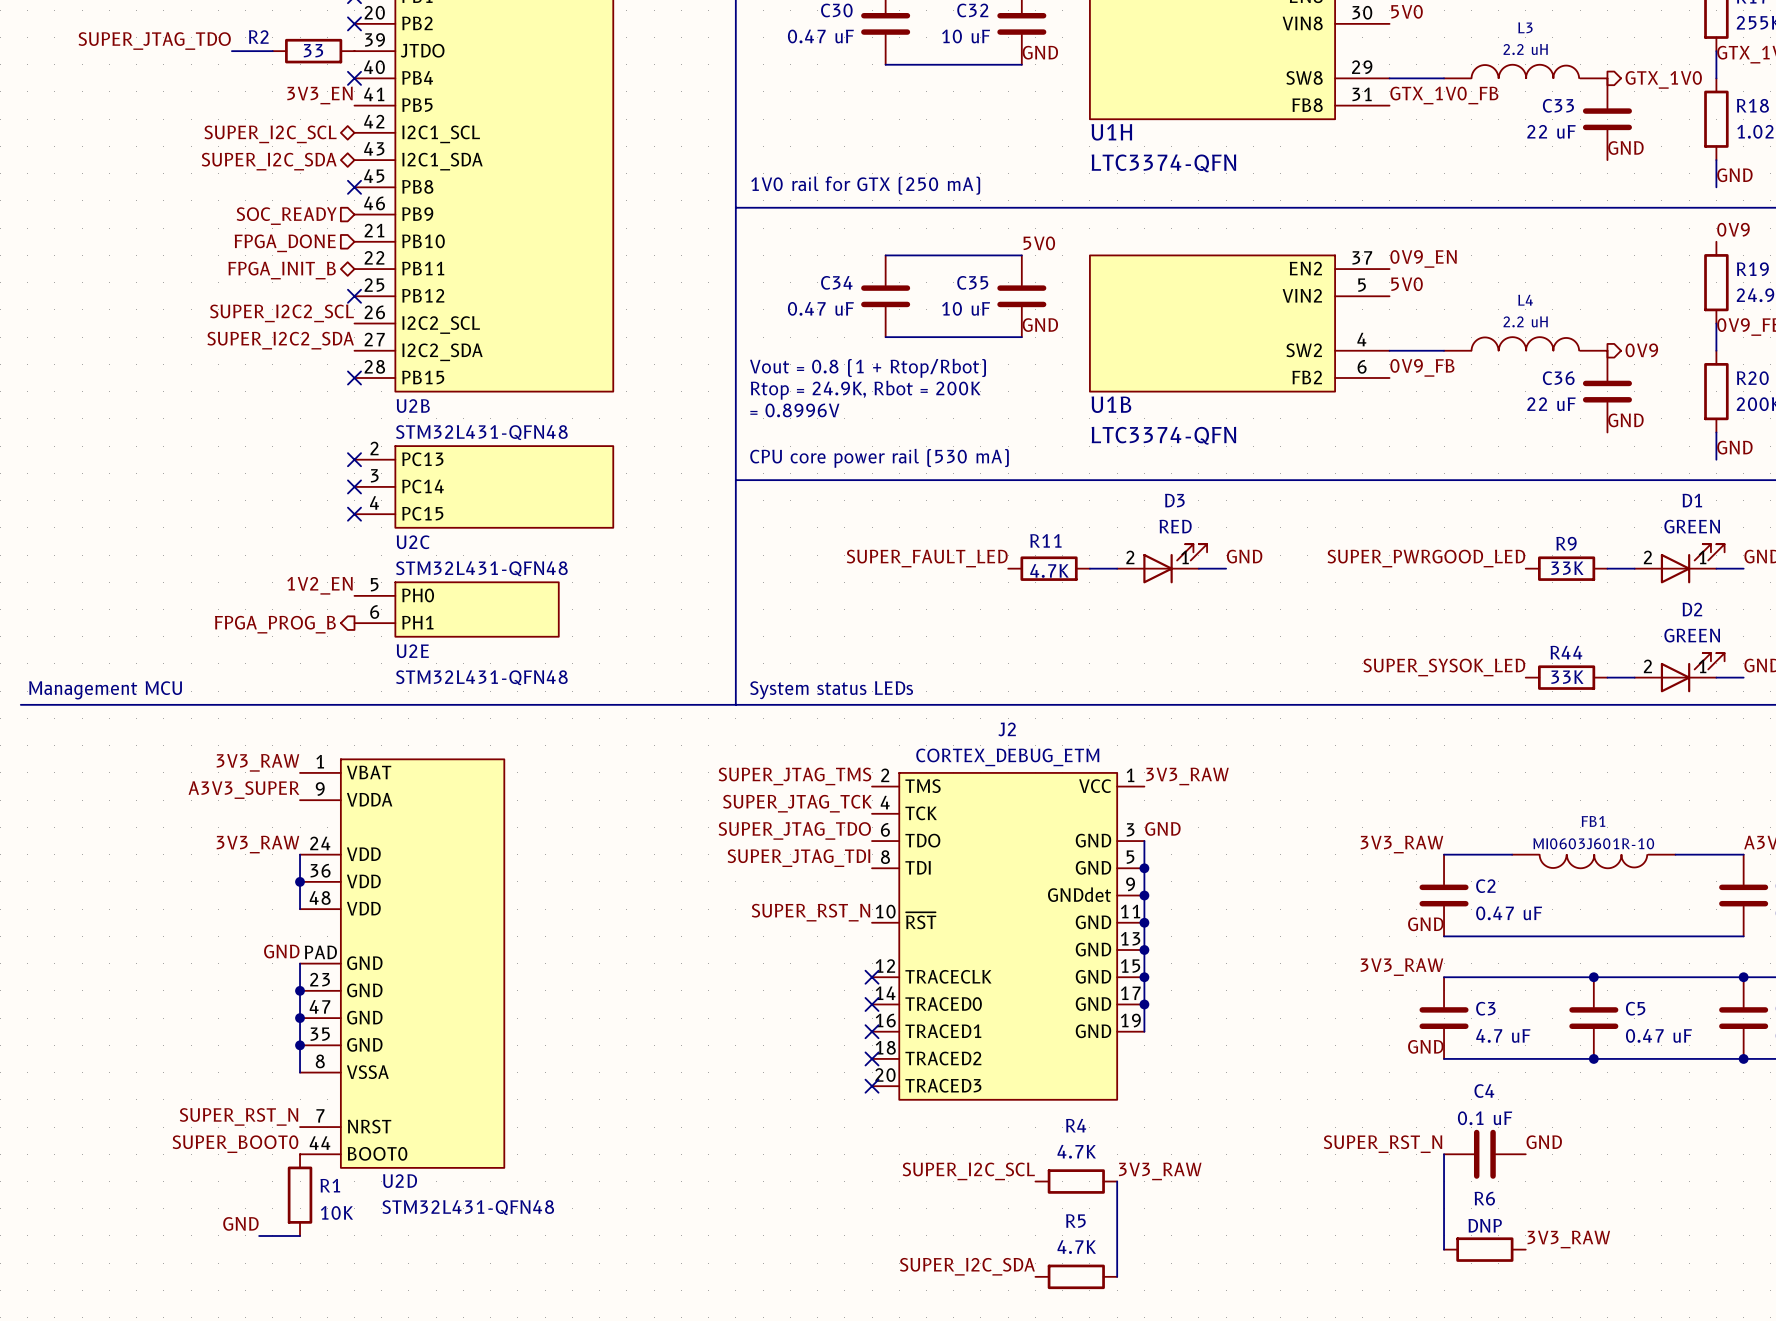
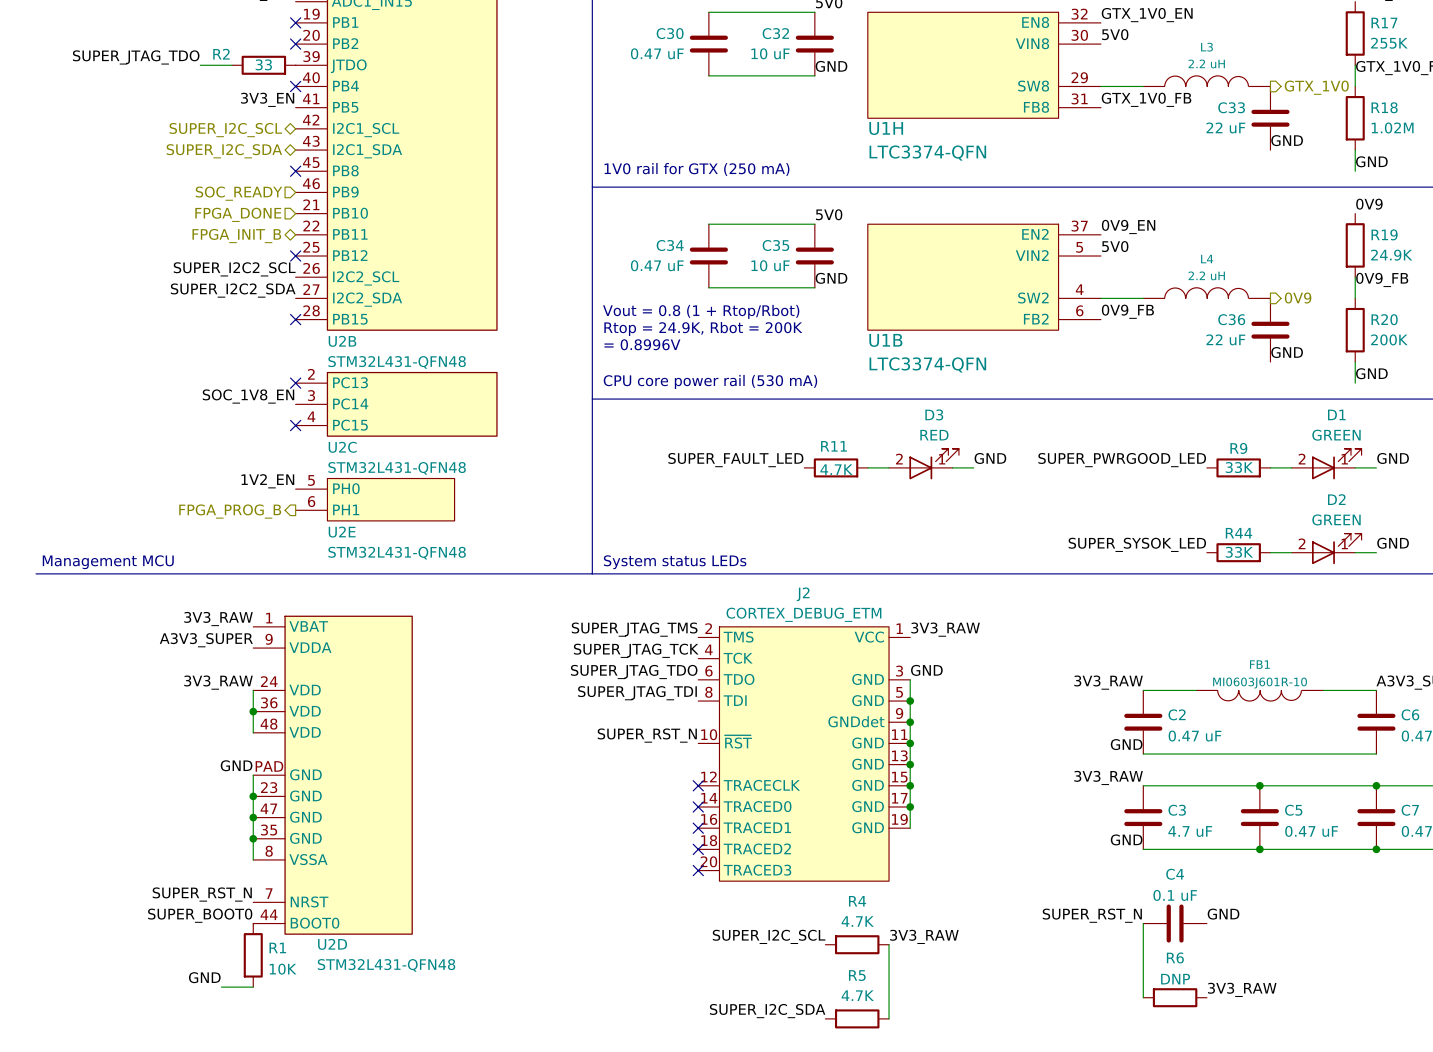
label: none -> SOC_1V8_EN (248, 396)
no-connect mark: (354, 486) -> none

